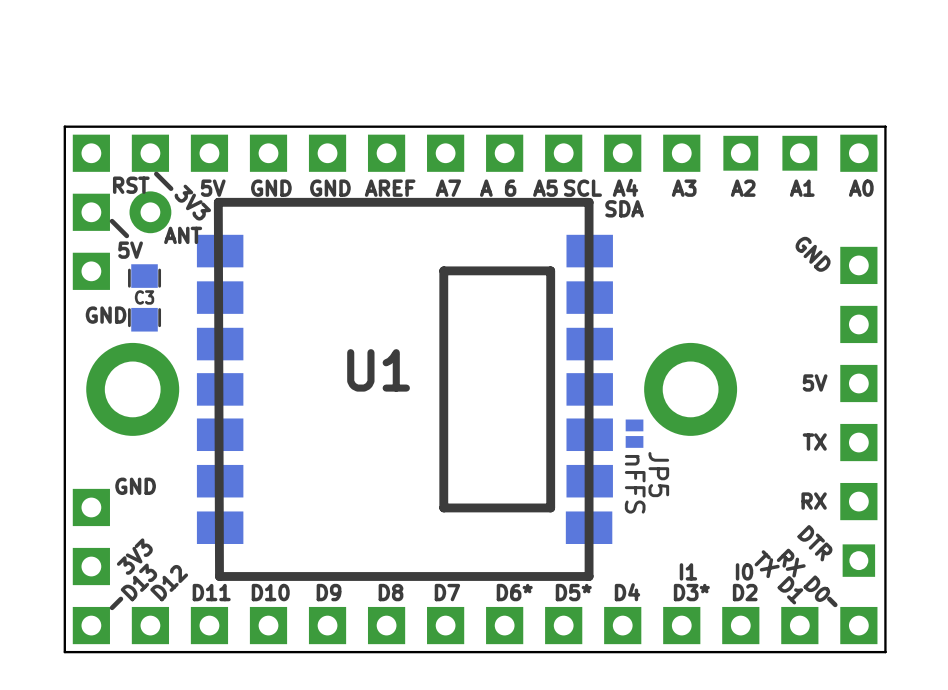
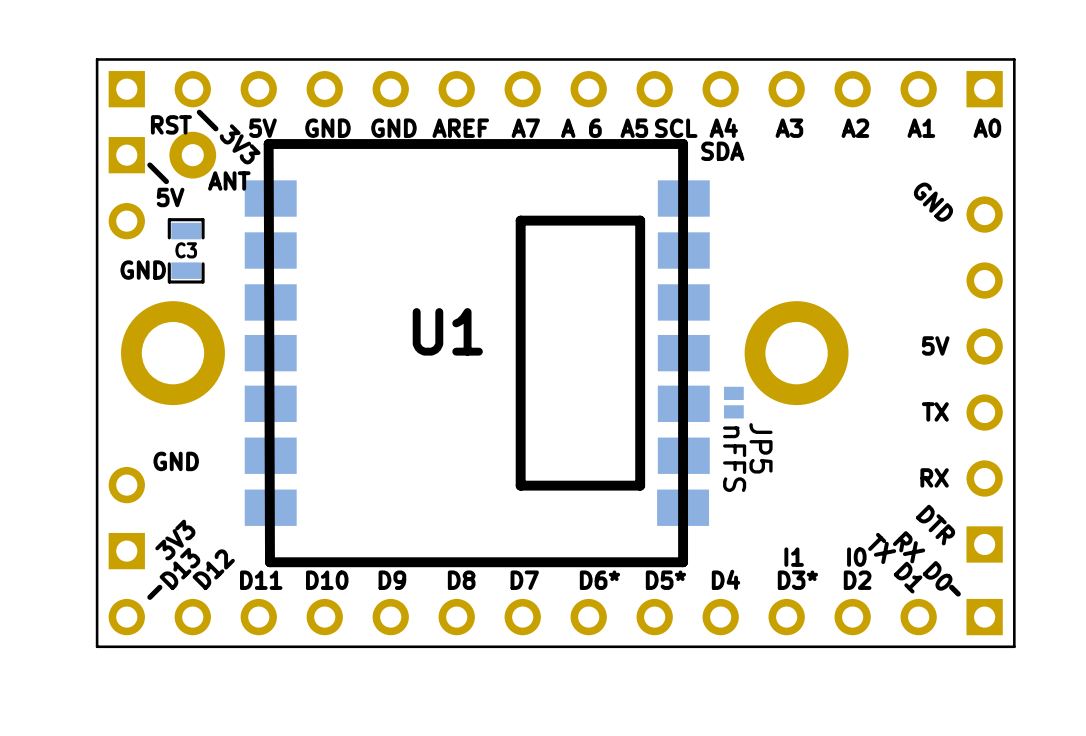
part footprint: [72, 134, 406, 172] -> [108, 71, 475, 108]
part footprint: [427, 134, 878, 172] -> [504, 71, 1003, 108]
part footprint: [72, 193, 110, 290] -> [108, 137, 145, 240]
part footprint: [840, 246, 878, 577] -> [966, 196, 1003, 563]
C3 footprint: [128, 264, 162, 332] -> [167, 218, 205, 284]
part footprint: [72, 488, 110, 586] -> [108, 466, 145, 570]
part footprint: [72, 606, 406, 645] -> [108, 598, 475, 636]
part footprint: [427, 606, 878, 645] -> [504, 598, 1003, 636]

